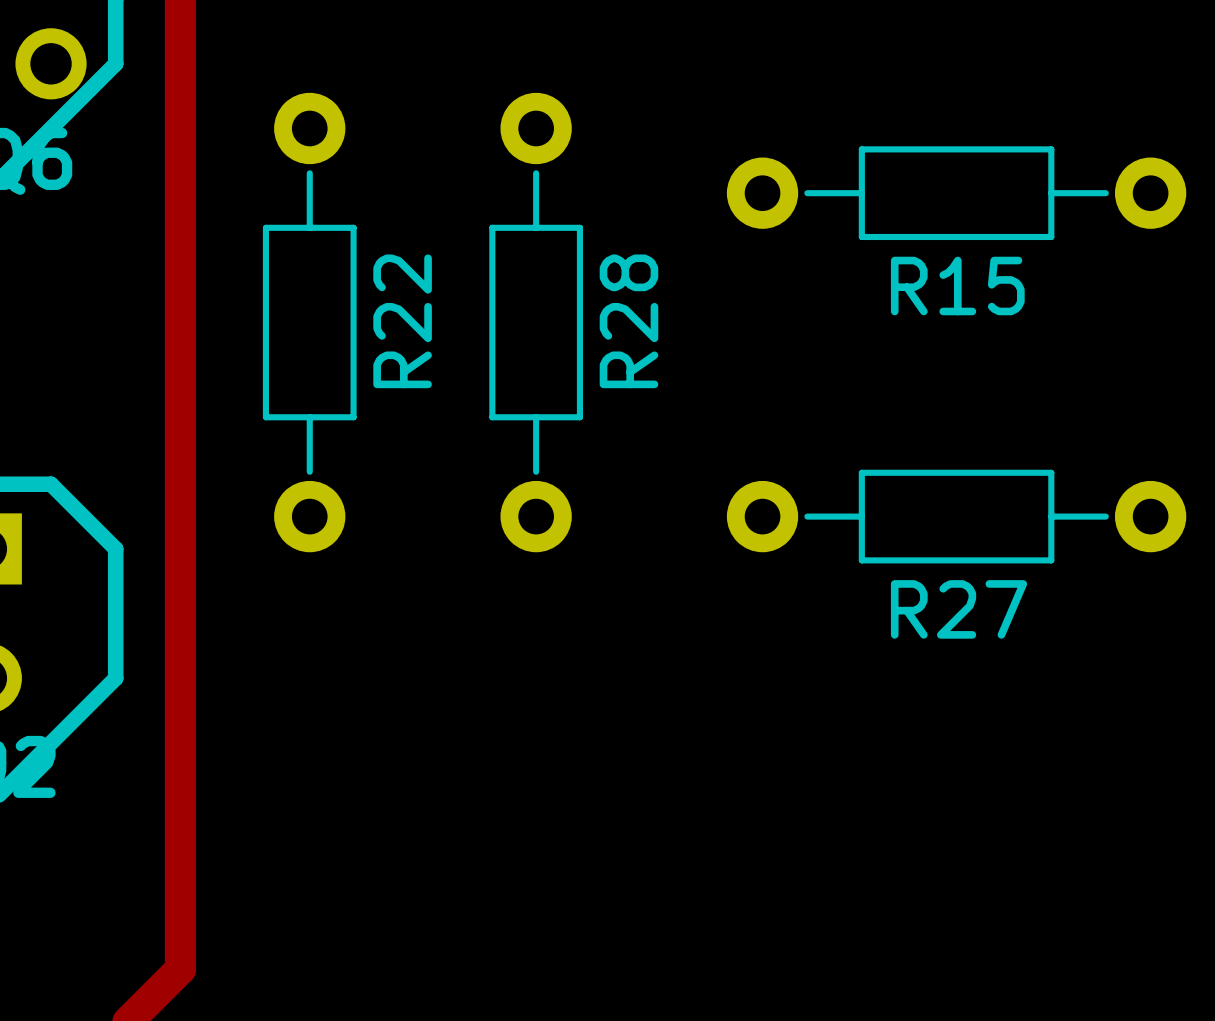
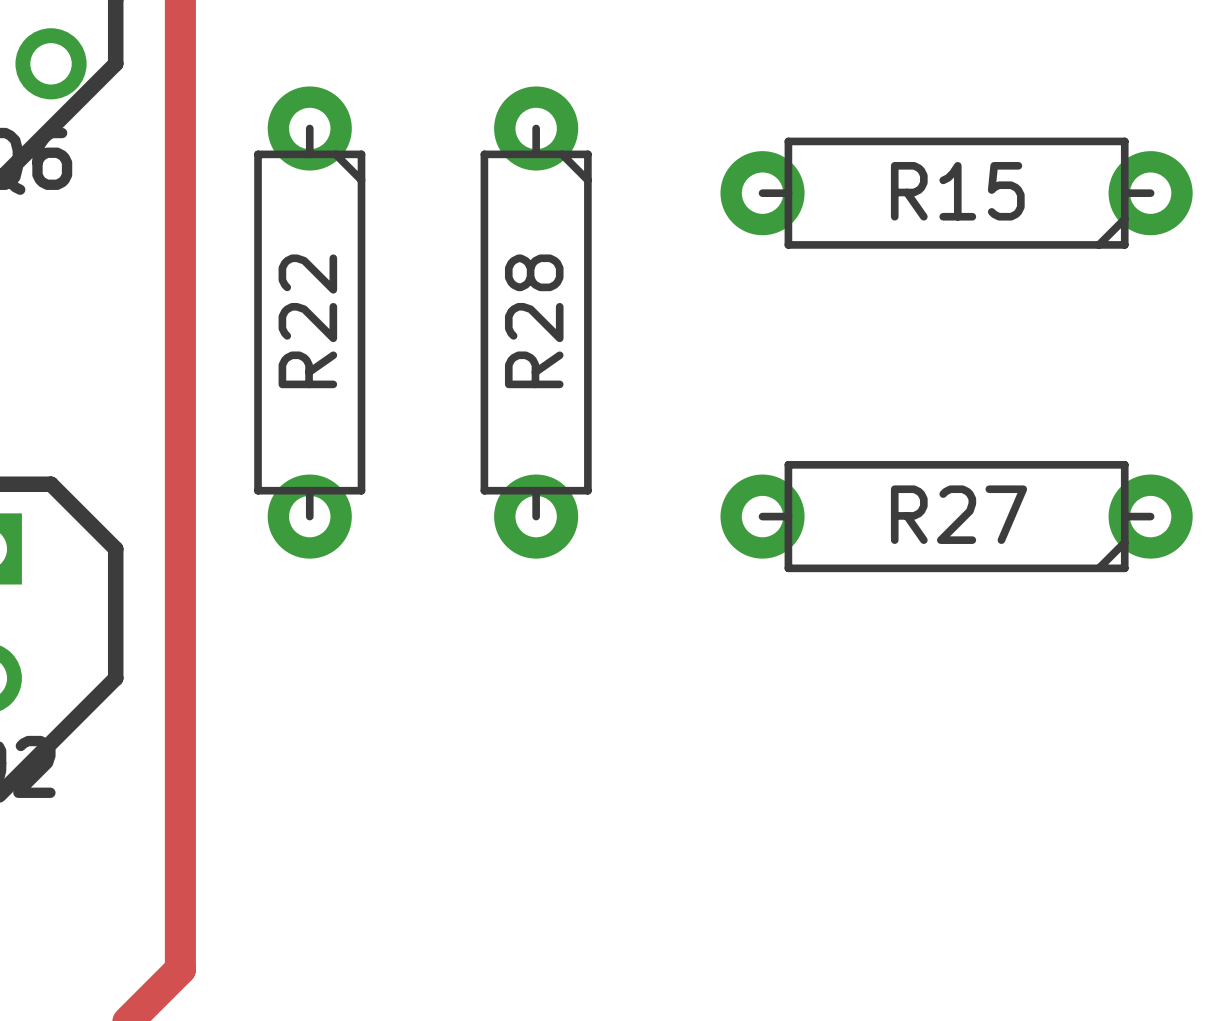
R22 footprint: [262, 92, 357, 553] -> [254, 86, 366, 559]
R28 footprint: [489, 92, 584, 553] -> [480, 86, 592, 559]
R15 footprint: [726, 146, 1187, 241] -> [720, 137, 1193, 249]
R27 footprint: [726, 469, 1187, 564] -> [720, 461, 1193, 573]

